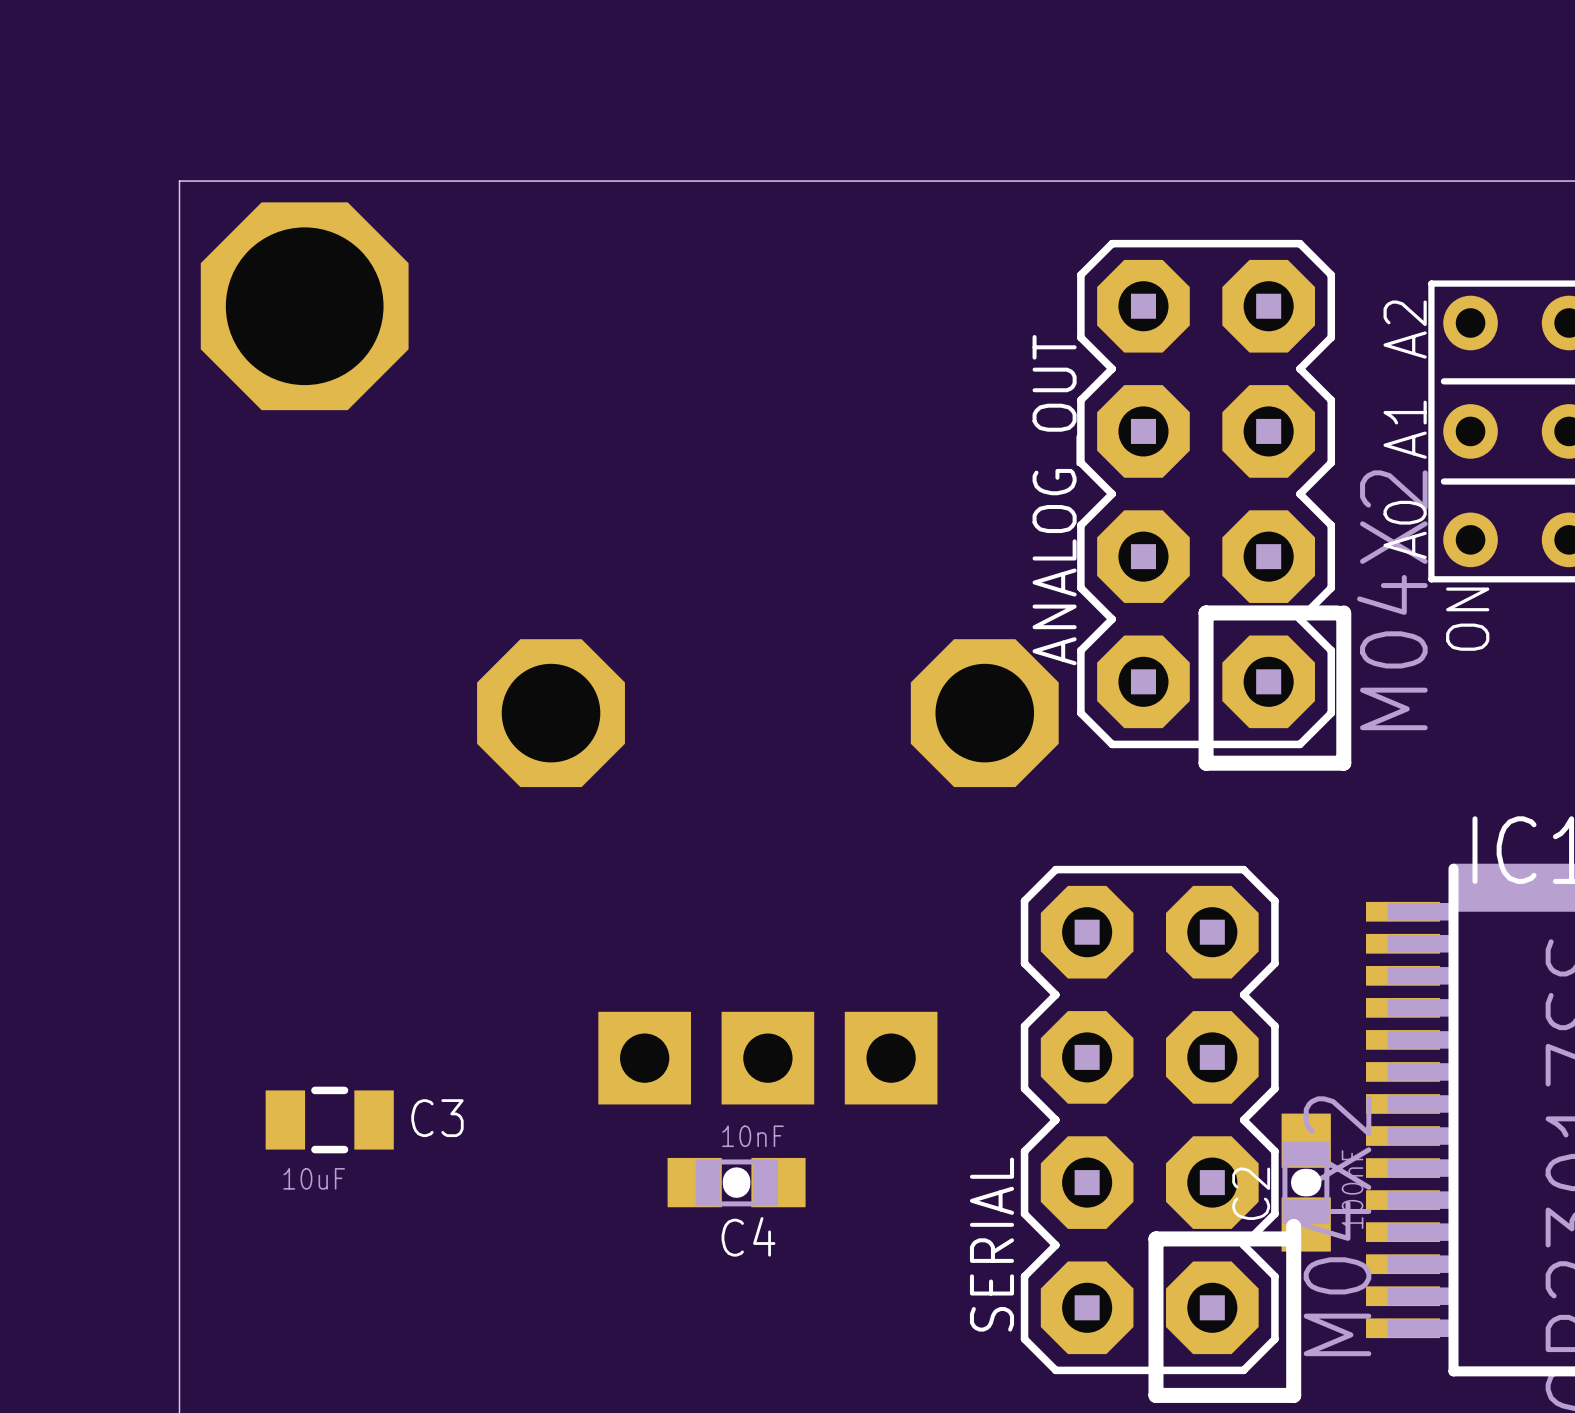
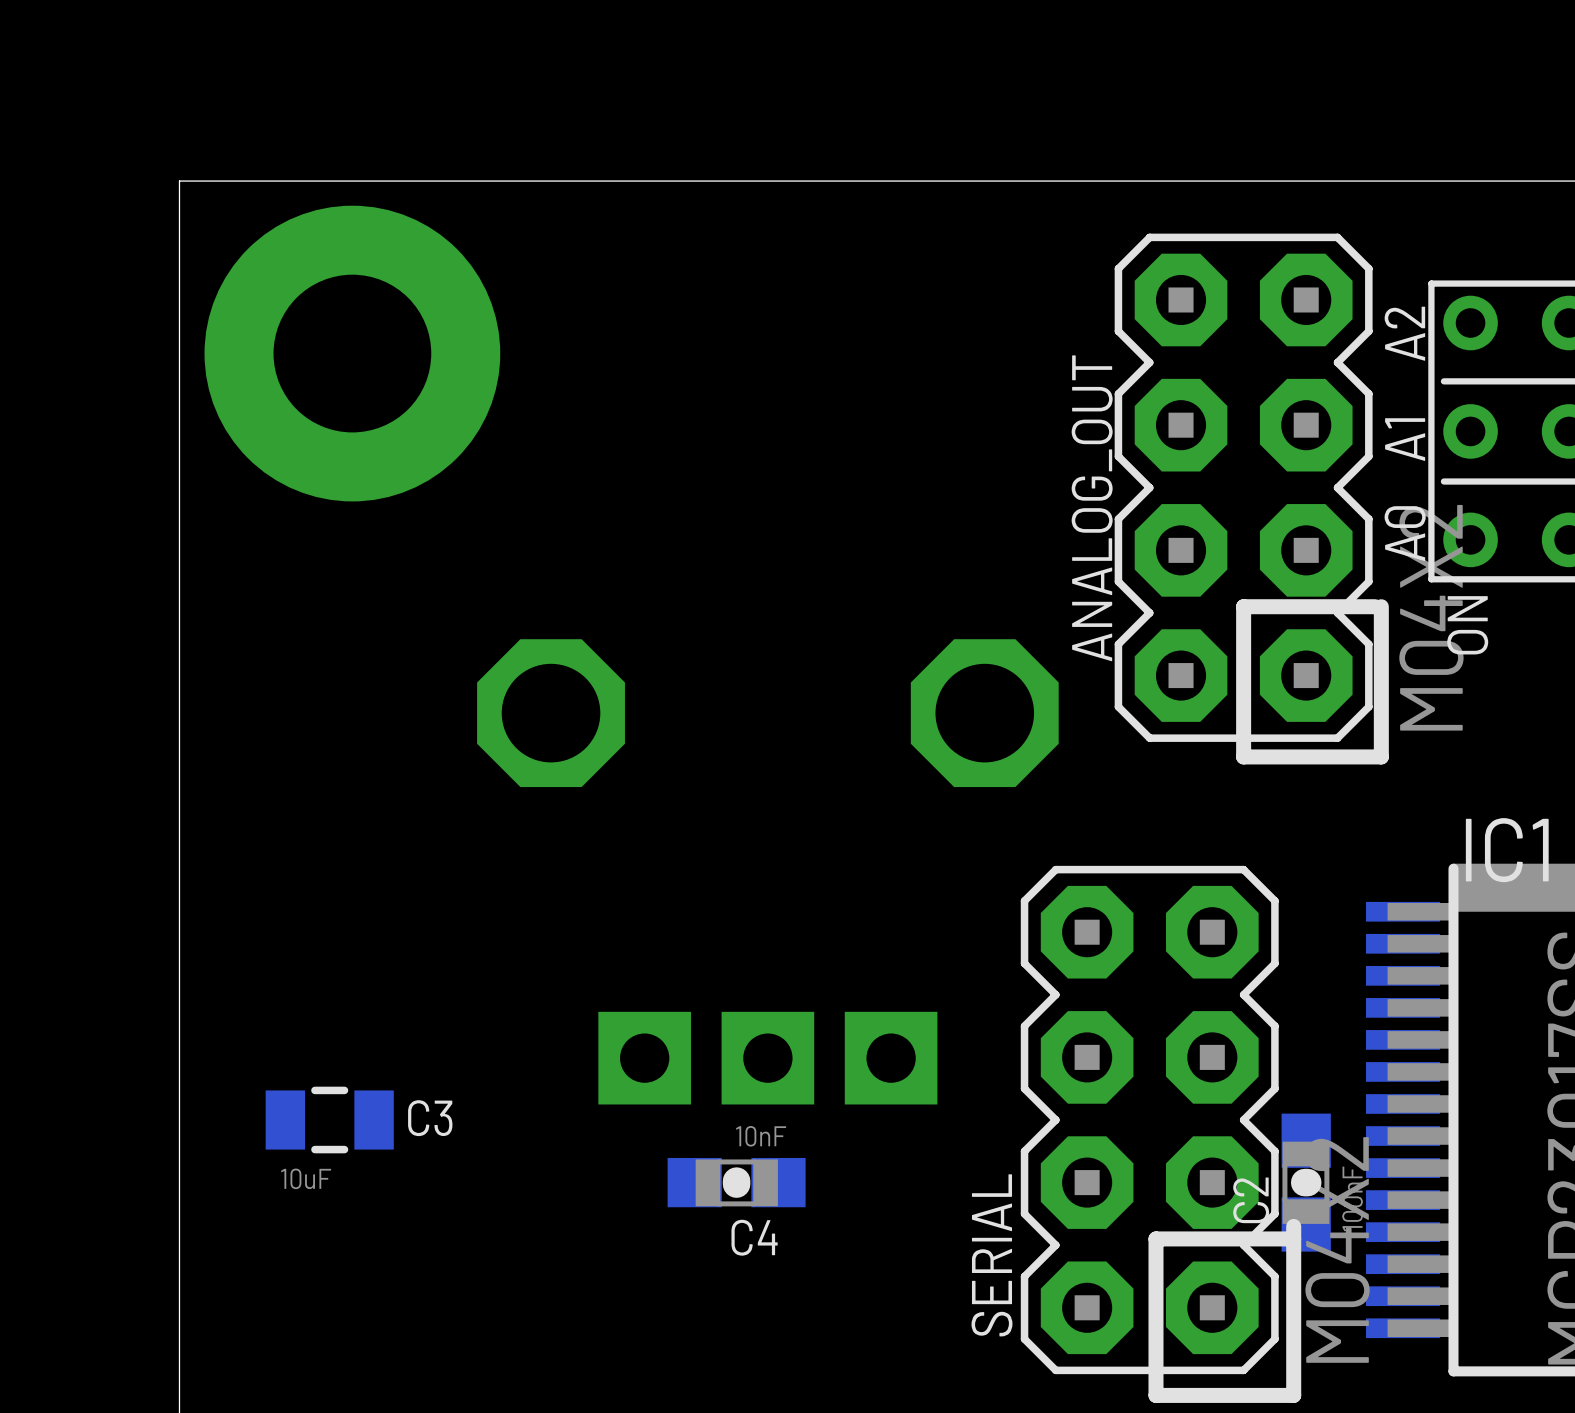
part: (304, 306) -> none
part: none -> (352, 353)
ANALOG_OUT position: (1206, 494) -> (1243, 487)
line: (1343, 612) (1343, 763) (1206, 763) (1206, 612) (1337, 612) -> (1381, 606) (1381, 756) (1243, 756) (1243, 606) (1375, 606)

